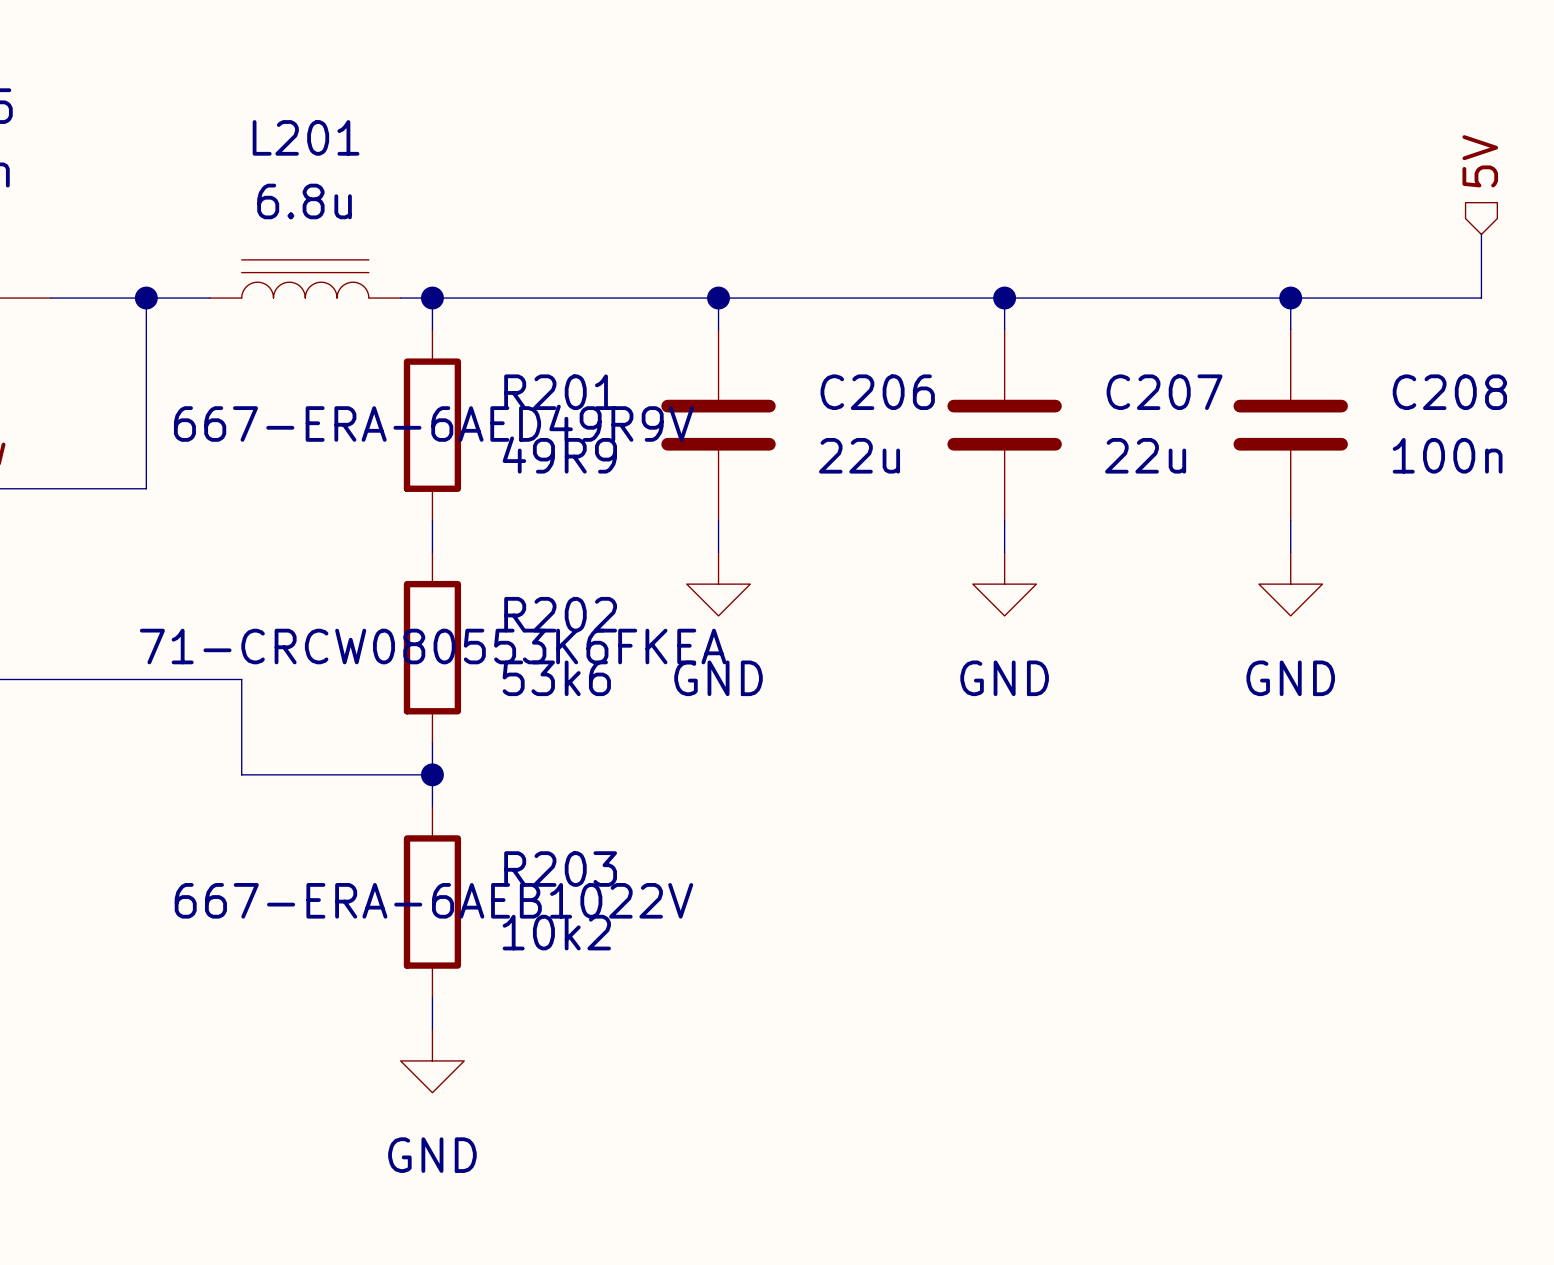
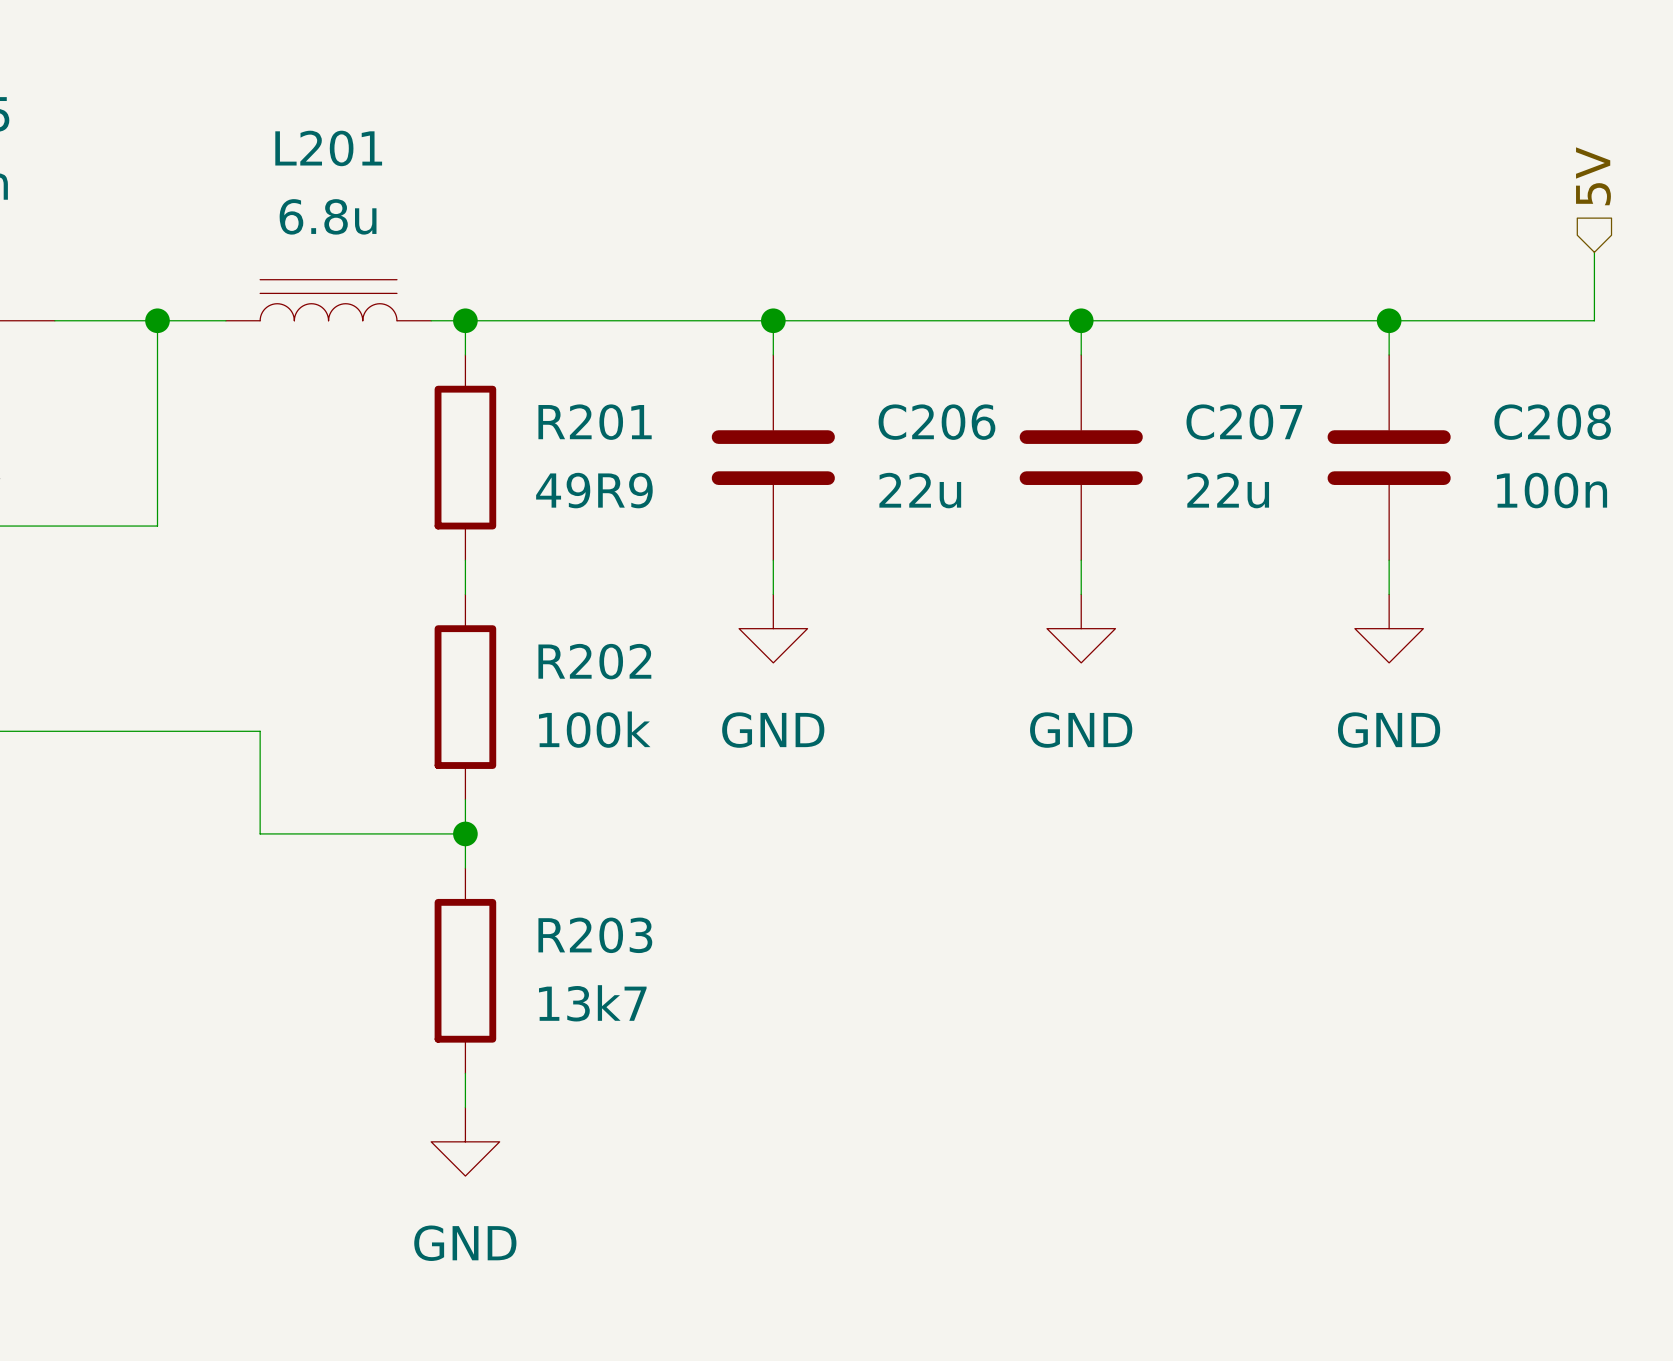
R201 text: 667-ERA-6AED49R9V (433, 423) -> none
R202 text: 71-CRCW080553K6FKEA (433, 646) -> none
R202 value: 53k6 (556, 678) -> 100k (594, 729)
R203 text: 667-ERA-6AEB1022V (433, 900) -> none
R203 value: 10k2 (556, 932) -> 13k7 (592, 1003)

